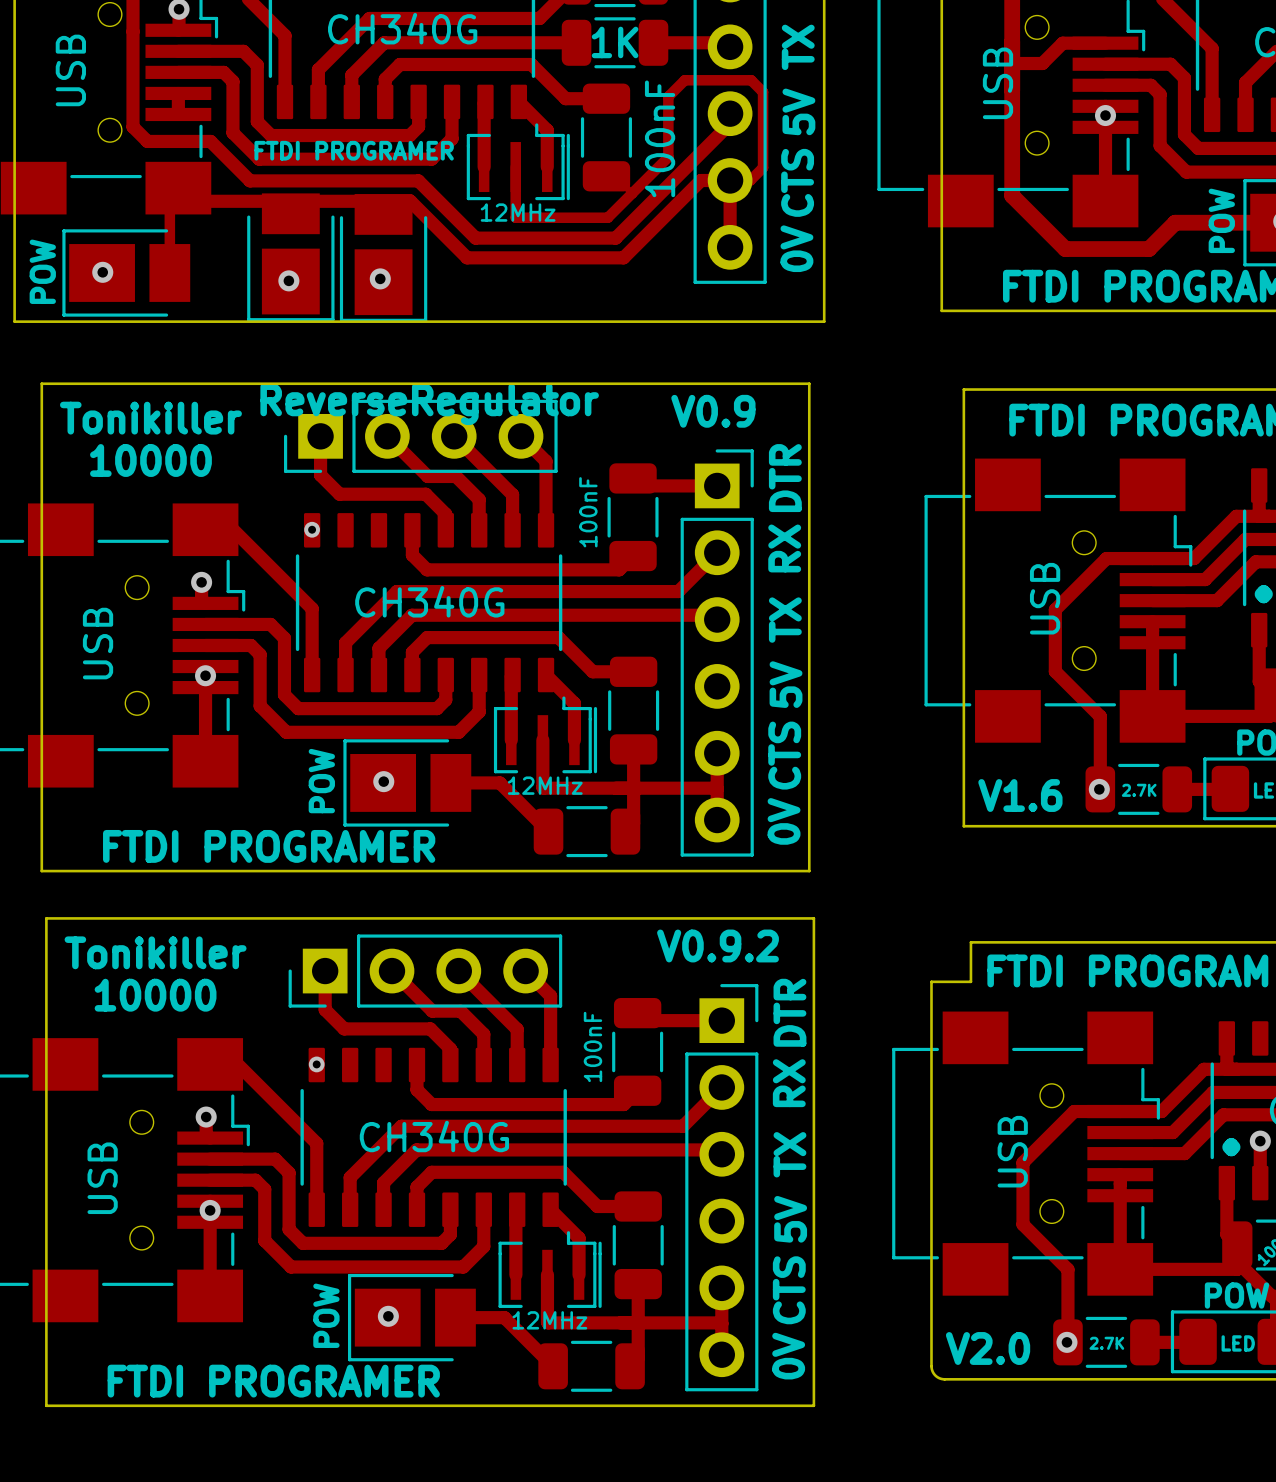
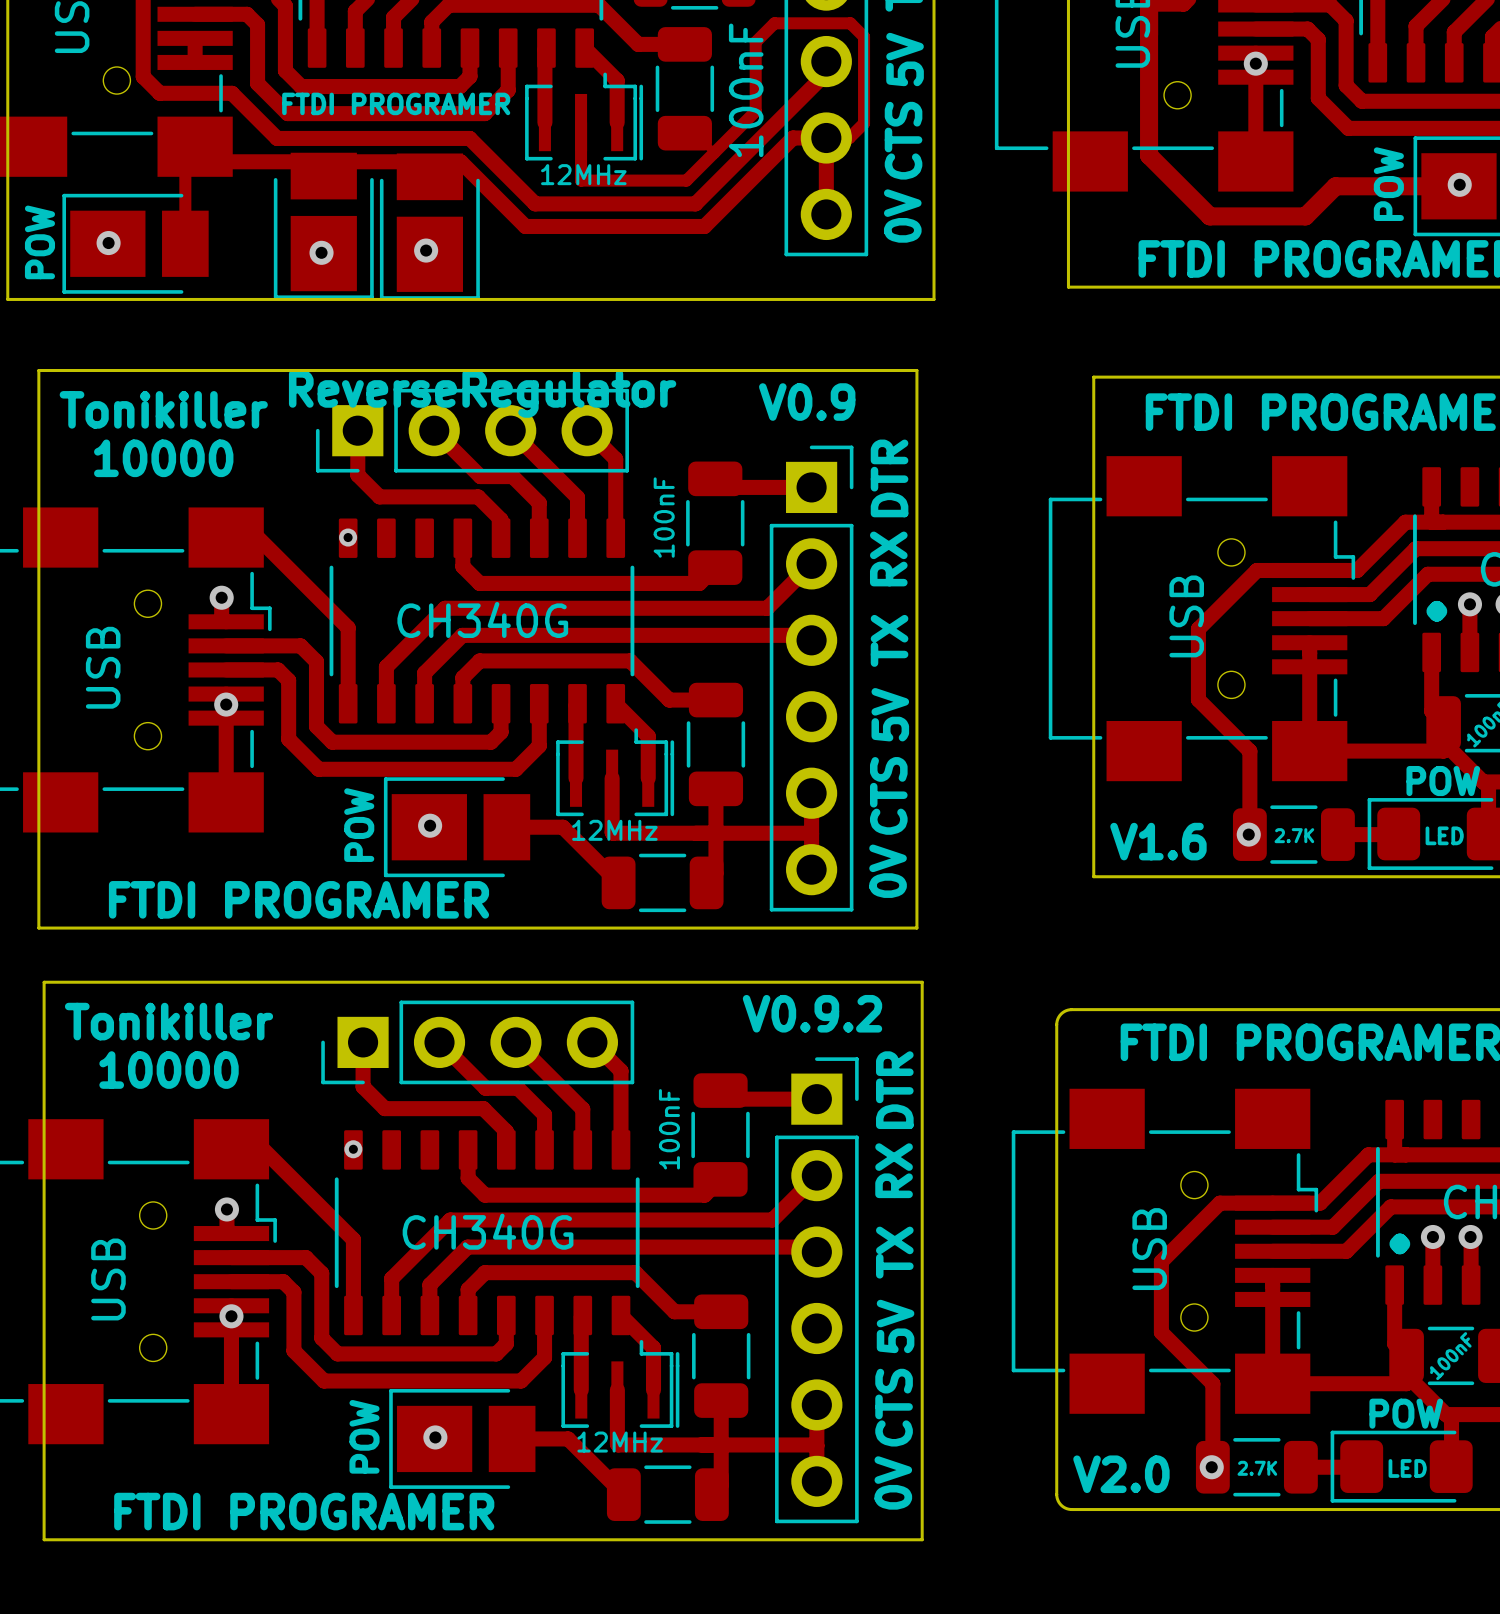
board edge: (970, 942) (970, 981) (931, 981) -> (1101, 1009) (1069, 1009) (1061, 1014) (1056, 1022) (1056, 1054)

